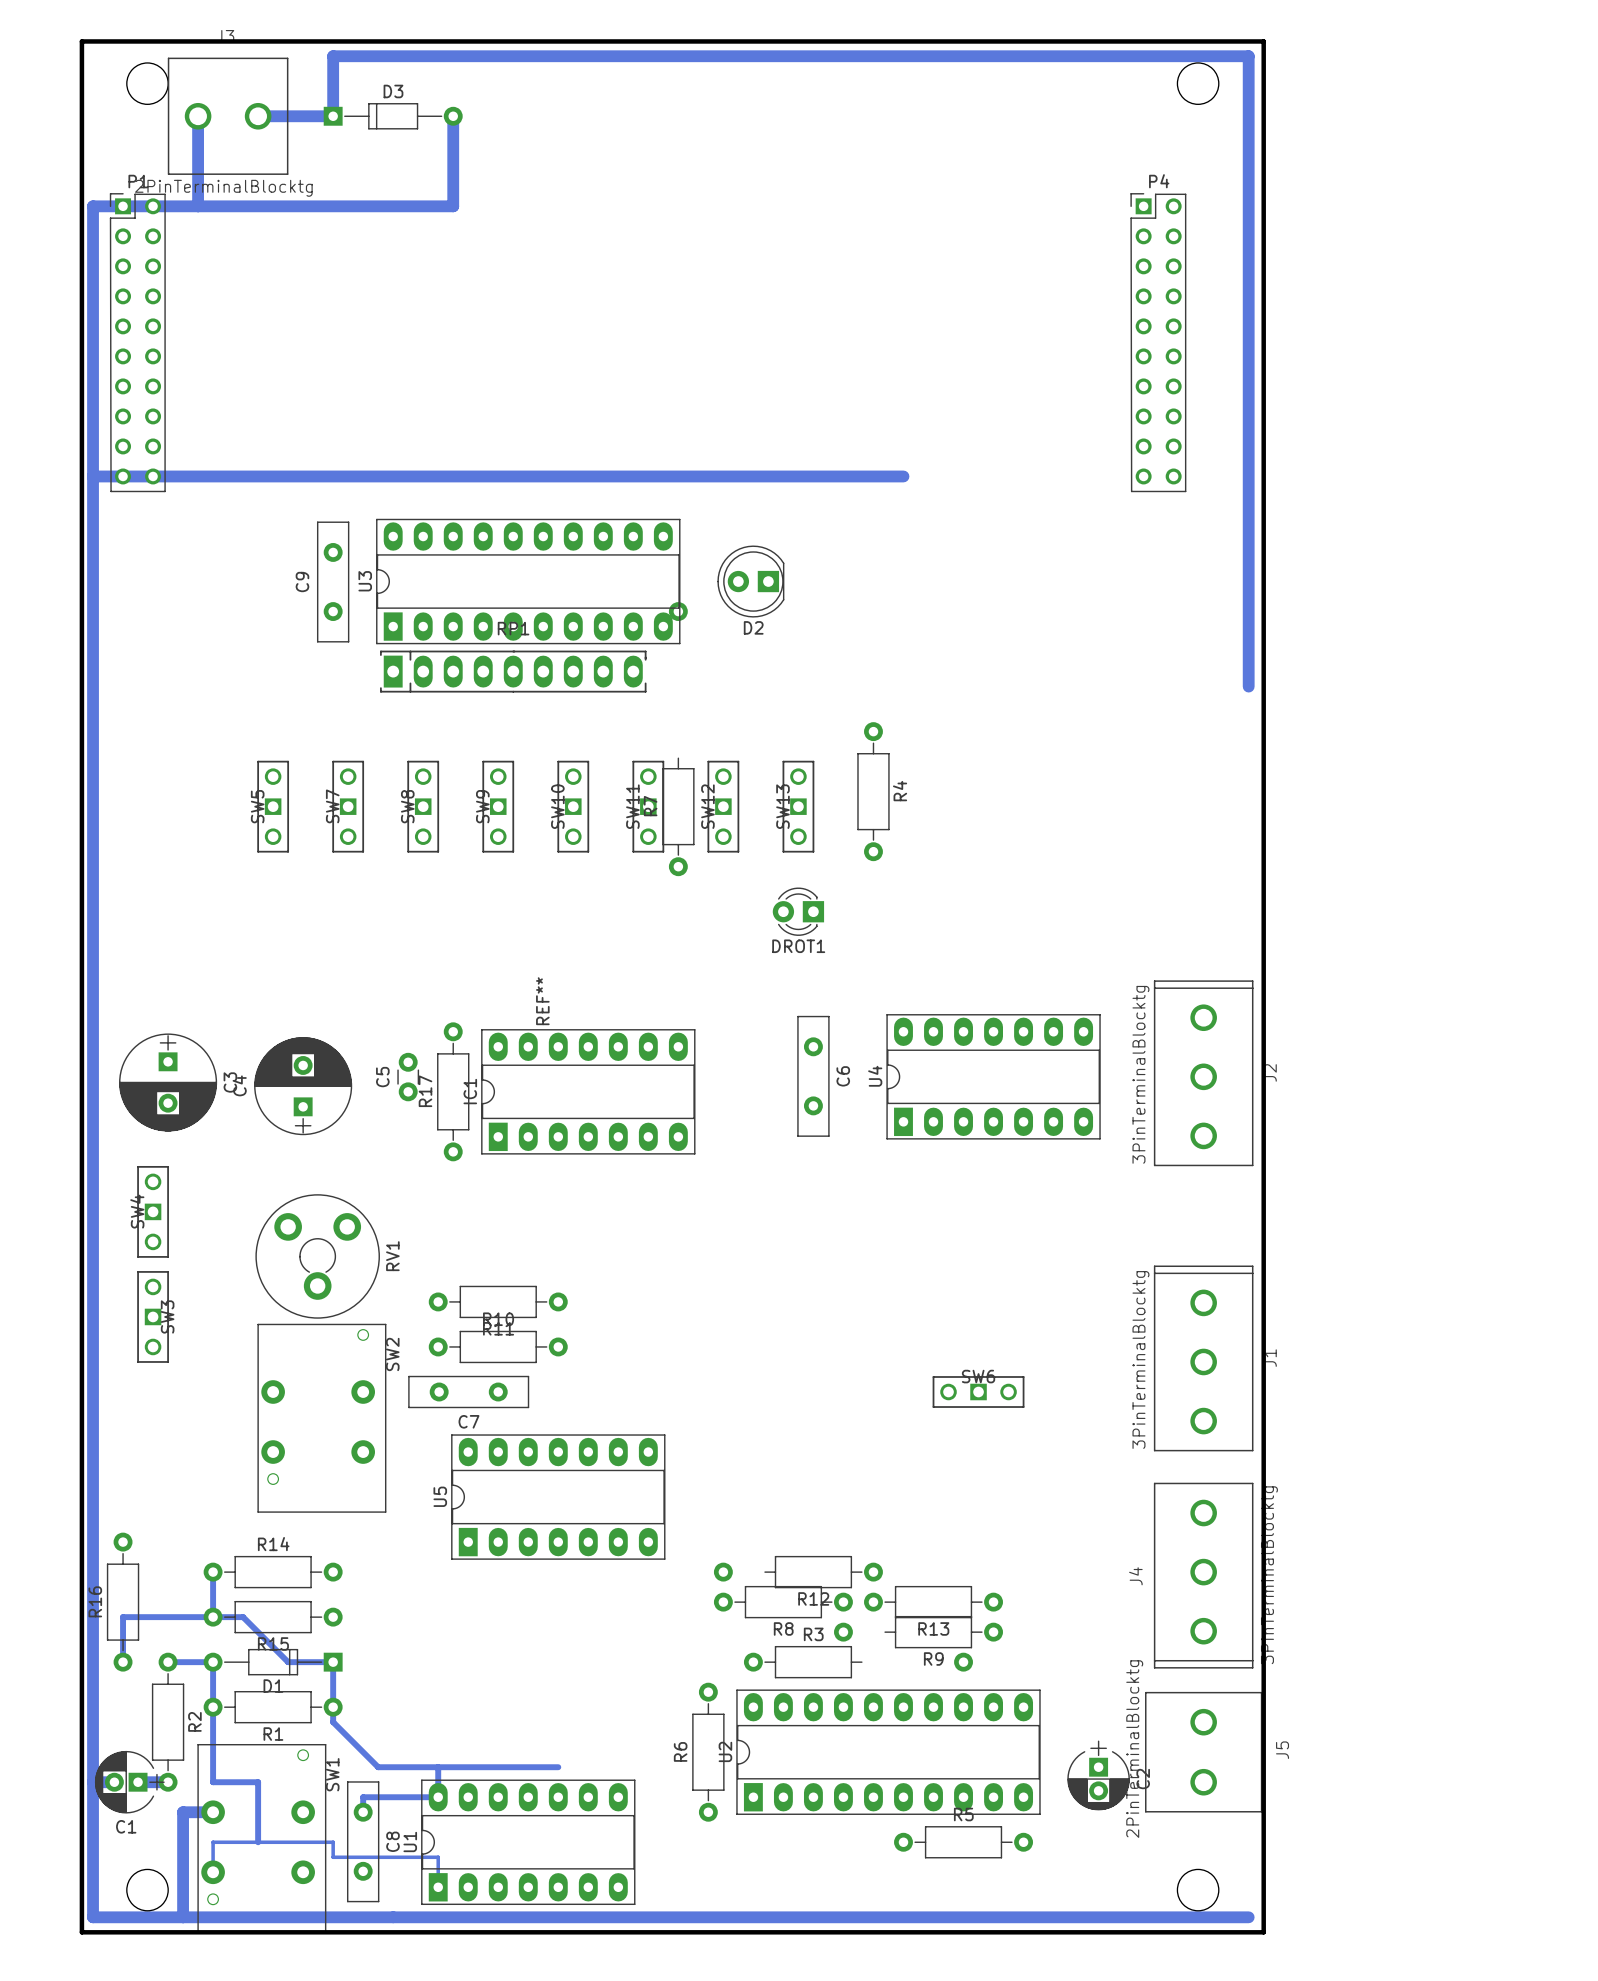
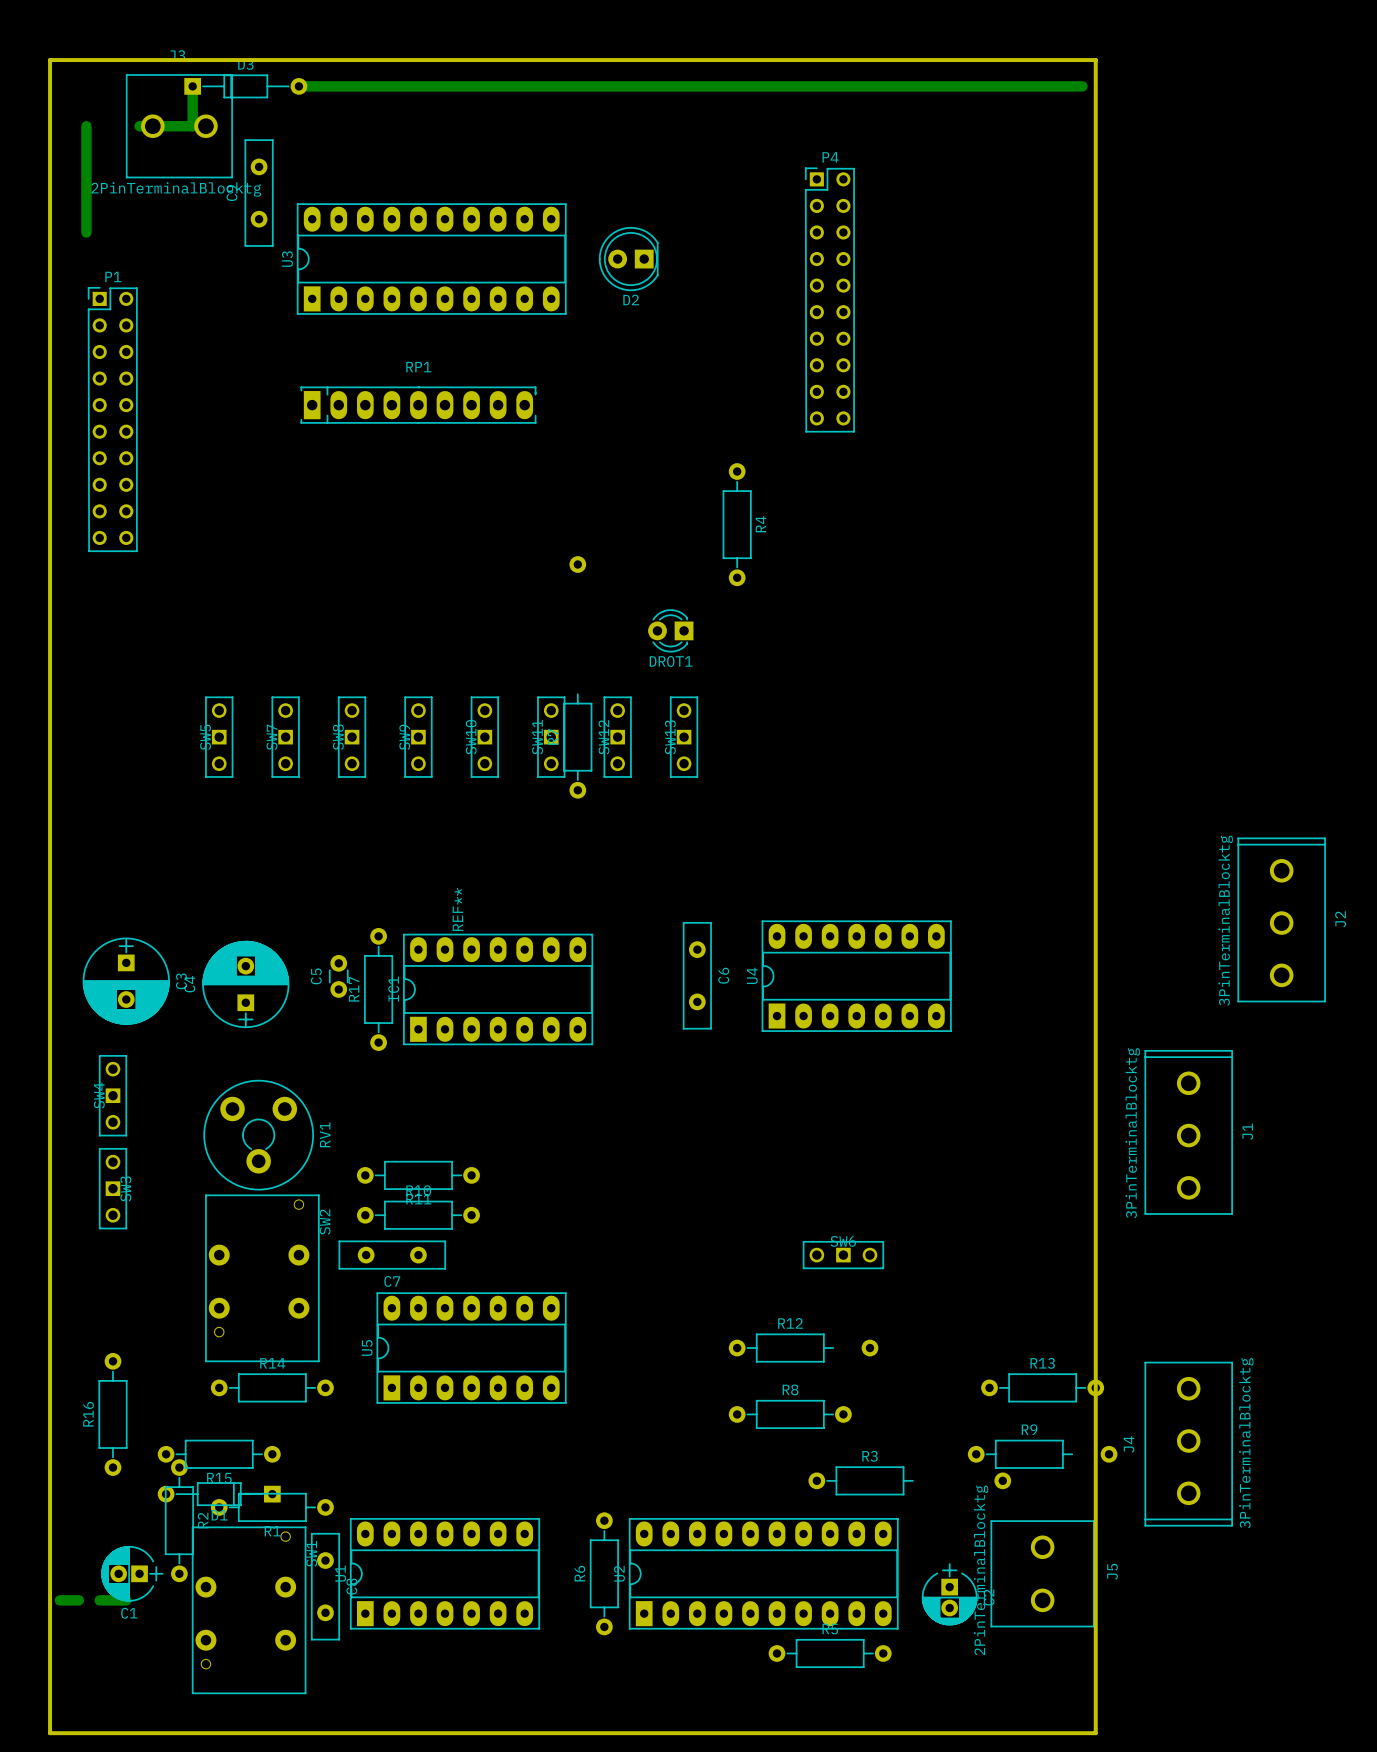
REF** footprint: [79, 39, 1266, 1935] -> [48, 58, 1098, 1736]
bottom track: none -> (192, 86) (192, 126) (139, 126)
bottom track: none -> (298, 86) (1082, 86)
bottom track: none -> (86, 126) (86, 232)
bottom track: (198, 116) (198, 206) -> none
bottom track: (258, 116) (333, 116) (333, 56) (1248, 56) (1248, 686) -> none
D3 position: (393, 116) -> (245, 86)
bottom track: (453, 116) (453, 206) (93, 206) (93, 1917) (1248, 1917) -> none
P1 position: (137, 342) -> (112, 419)
P4 position: (1158, 342) -> (829, 299)
bottom track: (93, 476) (903, 476) -> none
U3 position: (528, 581) -> (431, 259)
D2 position: (750, 581) -> (628, 259)
C9 position: (333, 582) -> (259, 193)
RP1 position: (513, 671) -> (418, 405)
R4 position: (873, 791) -> (737, 524)
DROT1 position: (798, 911) -> (670, 630)
J2 position: (1203, 1073) -> (1281, 919)
J1 position: (1203, 1358) -> (1188, 1132)
bottom track: (213, 1572) (213, 1617) -> none
R14 position: (273, 1572) -> (272, 1387)
R12 rotation: 0° (798, 1572) -> 180° (803, 1348)
R12 position: (798, 1572) -> (803, 1348)
J4 position: (1203, 1575) -> (1188, 1444)
R16 position: (123, 1602) -> (112, 1414)
R8 position: (783, 1602) -> (790, 1414)
R13 position: (933, 1602) -> (1042, 1387)
R8 name position: R8 (783, 1628) -> R8 (790, 1389)
R13 name position: R13 (933, 1628) -> R13 (1042, 1363)
R9 rotation: 0° (918, 1632) -> 180° (1042, 1454)
R9 position: (918, 1632) -> (1042, 1454)
bottom track: (123, 1662) (123, 1617) (243, 1617) (288, 1662) (333, 1662) (333, 1722) (378, 1767) (558, 1767) -> none
bottom track: (168, 1662) (213, 1662) (213, 1782) (258, 1782) (258, 1842) -> none
R3 position: (858, 1662) -> (909, 1480)
R1 position: (273, 1707) -> (272, 1507)
R2 position: (168, 1722) -> (179, 1520)
bottom track: (438, 1767) (438, 1797) (363, 1797) (363, 1812) -> none
C1 position: (129, 1782) -> (132, 1573)
bottom track: (213, 1812) (183, 1812) (183, 1917) -> none
SW1 position: (261, 1838) -> (249, 1610)
C8 position: (363, 1841) -> (325, 1586)
U1 position: (528, 1842) -> (445, 1573)
bottom track: (213, 1872) (213, 1842) (333, 1842) (333, 1857) (438, 1857) (438, 1887) -> none

